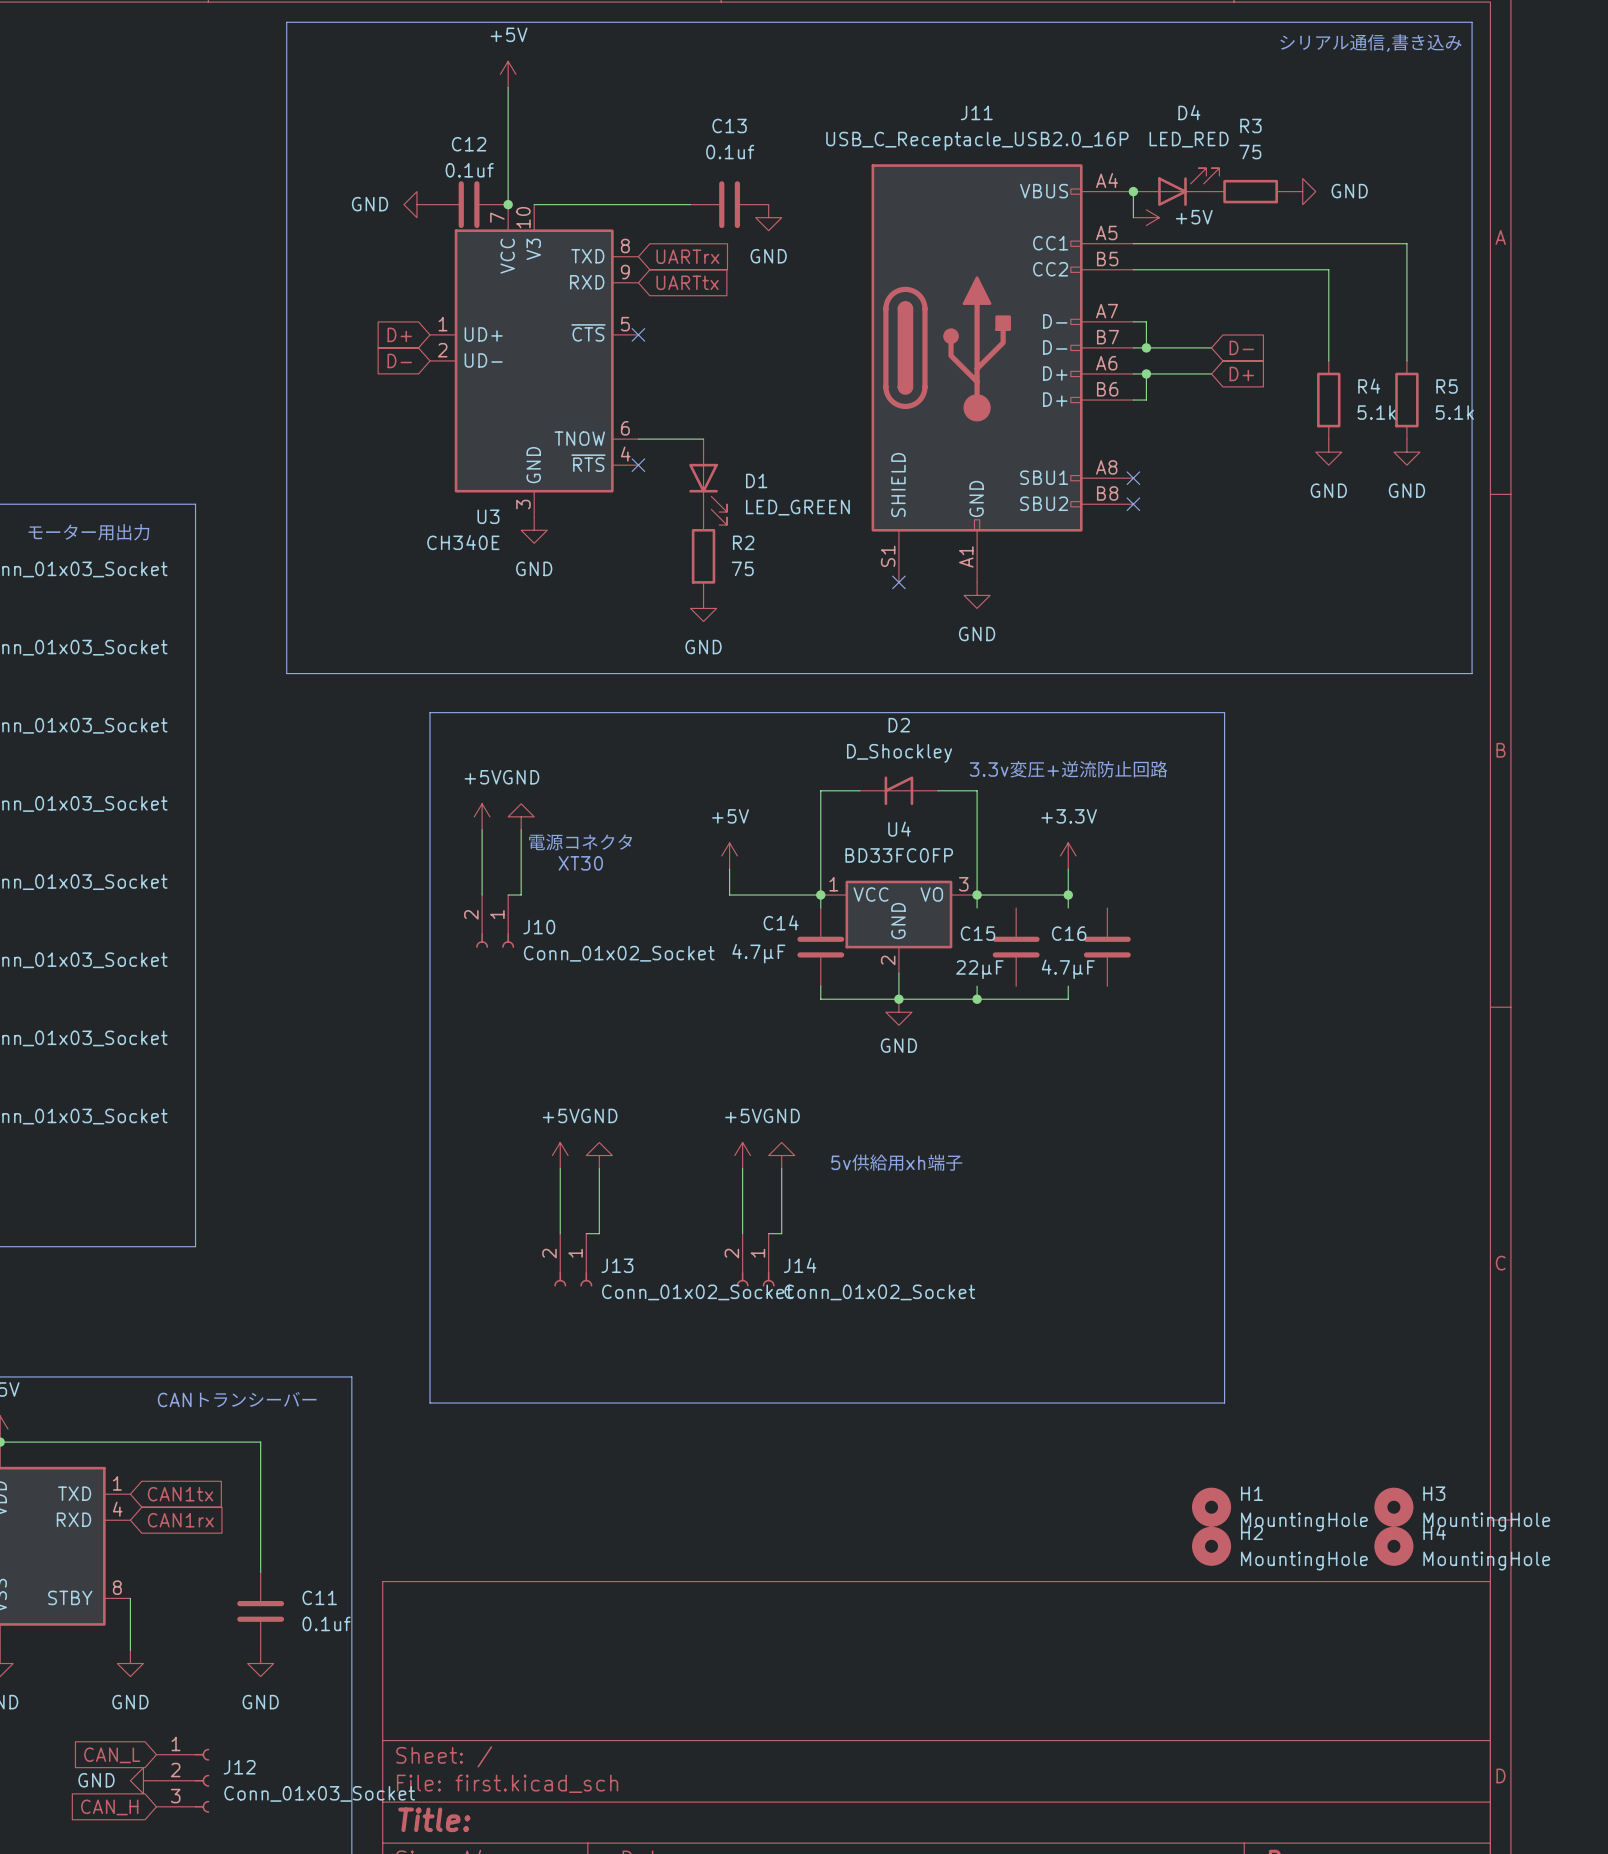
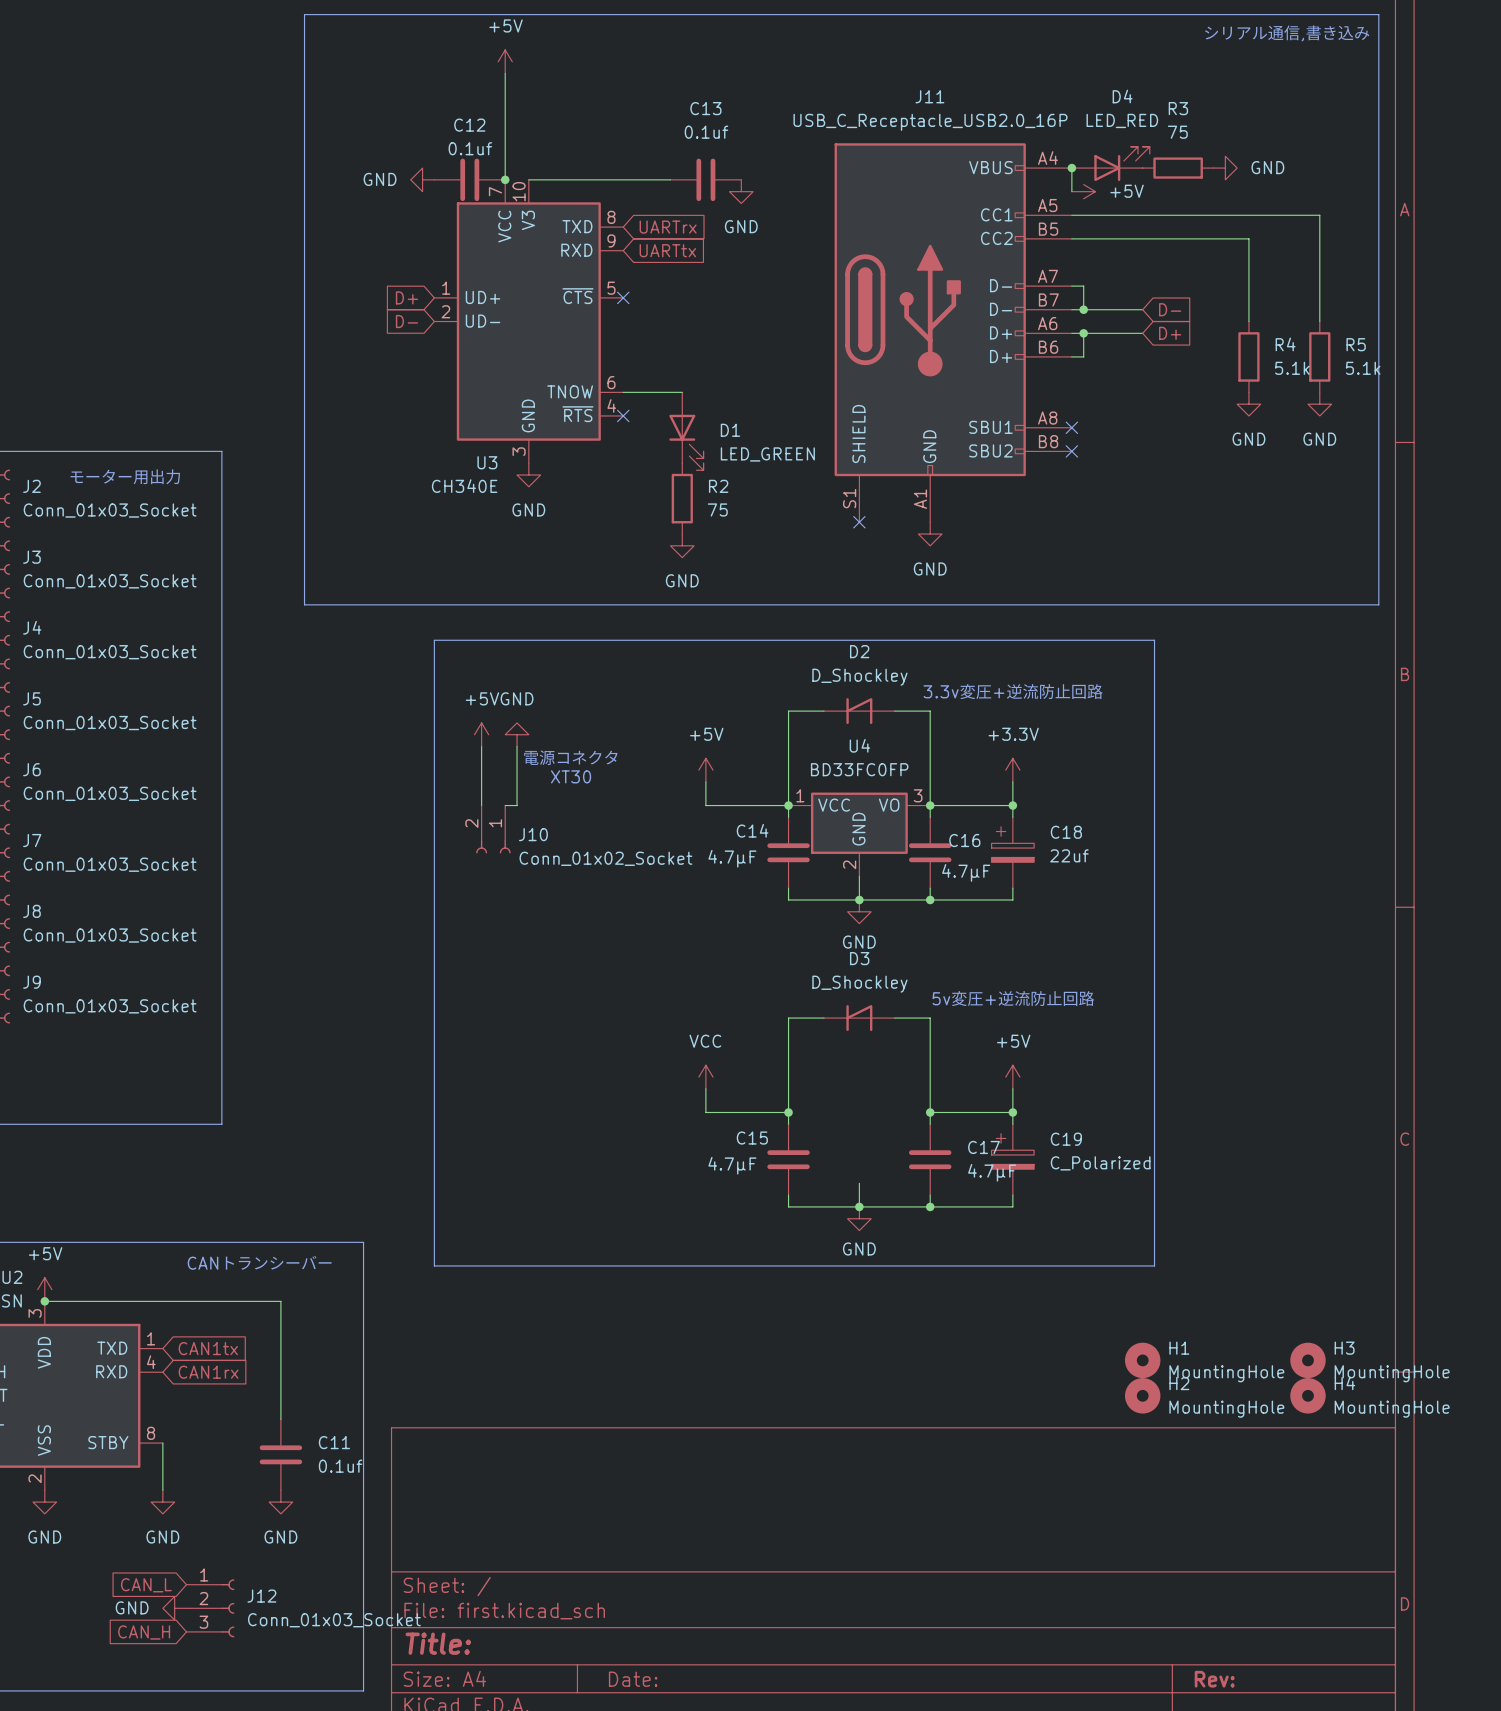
C15 name position: C15 (977, 933) -> C15 (752, 1138)
C16 name position: C16 (1069, 933) -> C16 (964, 840)
C15 position: (1016, 947) -> (788, 1159)
C18: none -> 22uf (1012, 852)
C16 position: (1107, 947) -> (930, 852)
C15 value: 22μF (979, 969) -> 4.7μF (732, 1165)
C16 value position: 4.7μF (1068, 969) -> 4.7μF (966, 872)
text: none -> 5v変圧+逆流防止回路 (1013, 998)
wire: none -> (823, 1018) (788, 1018) (788, 1124)
D3: none -> D_Shockley (859, 1018)
wire: none -> (894, 1018) (930, 1018) (930, 1124)
power symbol: +5V (560, 1155) -> none
power symbol: GND (599, 1155) -> none
power symbol: +5V (742, 1155) -> none
power symbol: GND (781, 1155) -> none
text: 5v供給用xh端子 (897, 1162) -> none
wire: (560, 1168) (560, 1233) -> none
wire: (599, 1168) (599, 1233) (586, 1233) -> none
wire: (742, 1168) (742, 1233) -> none
wire: (781, 1168) (781, 1233) -> (788, 1112) (753, 1112)
power symbol: none -> VCC (705, 1077)
power symbol: none -> +5V (1012, 1077)
wire: none -> (705, 1088) (705, 1112) (741, 1112)
wire: none -> (1012, 1088) (1012, 1124)
junction: none -> (788, 1112)
wire: none -> (930, 1112) (1012, 1112)
junction: none -> (930, 1112)
junction: none -> (1012, 1112)
J13: Conn_01x02_Socket (573, 1260) -> none
J14: Conn_01x02_Socket (755, 1260) -> none
C17: none -> 4.7μF (930, 1159)
C19: none -> C_Polarized (1012, 1159)
wire: none -> (859, 1183) (859, 1206)
wire: none -> (788, 1195) (788, 1206) (1012, 1206) (1012, 1195)
wire: none -> (930, 1195) (930, 1206)
junction: none -> (859, 1206)
junction: none -> (930, 1206)
power symbol: none -> GND (859, 1218)

